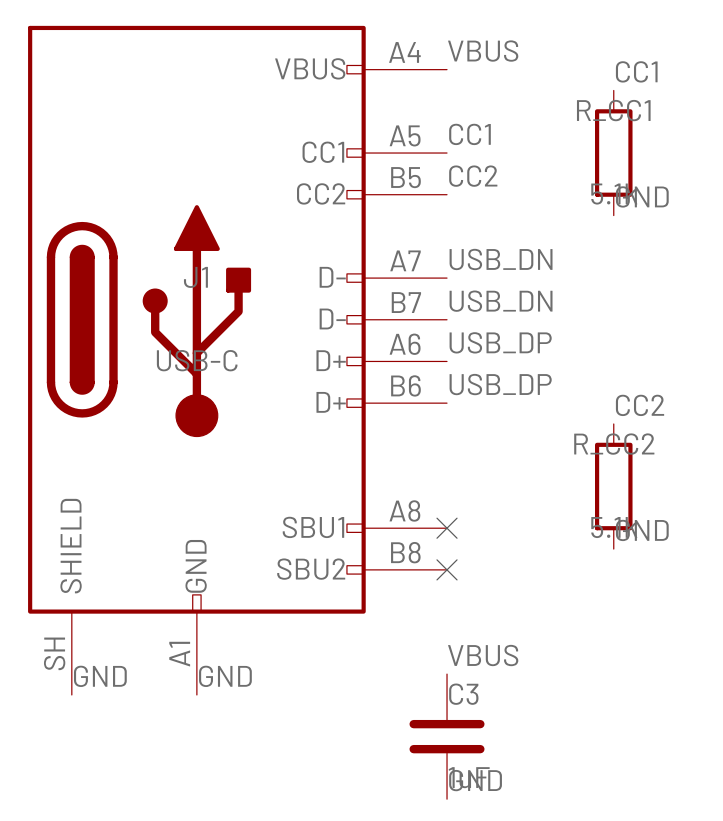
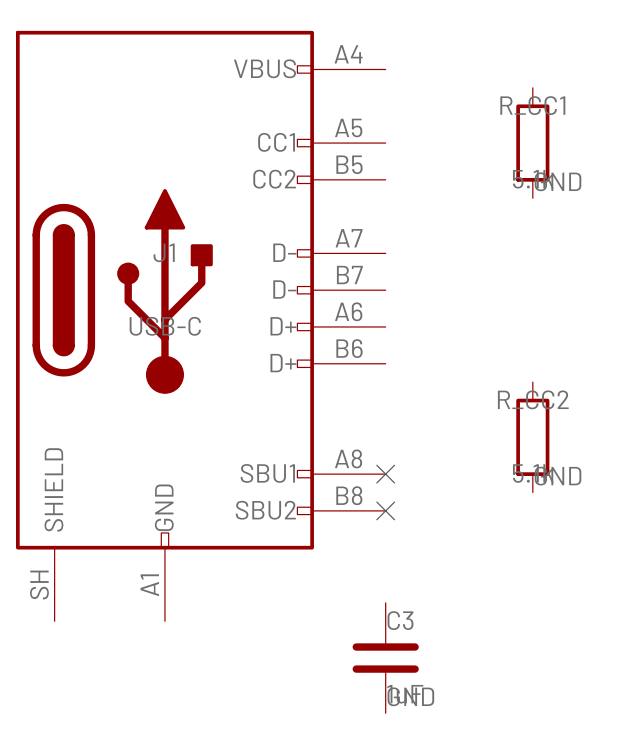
label: VBUS (483, 51) -> none
label: CC1 (636, 71) -> none
label: CC1 (469, 134) -> none
label: CC2 (473, 176) -> none
label: USB_DN (501, 259) -> none
label: USB_DN (501, 301) -> none
label: USB_DP (500, 342) -> none
label: USB_DP (500, 384) -> none
label: CC2 (640, 405) -> none
label: VBUS (483, 655) -> none
label: GND (100, 676) -> none
label: GND (225, 676) -> none

